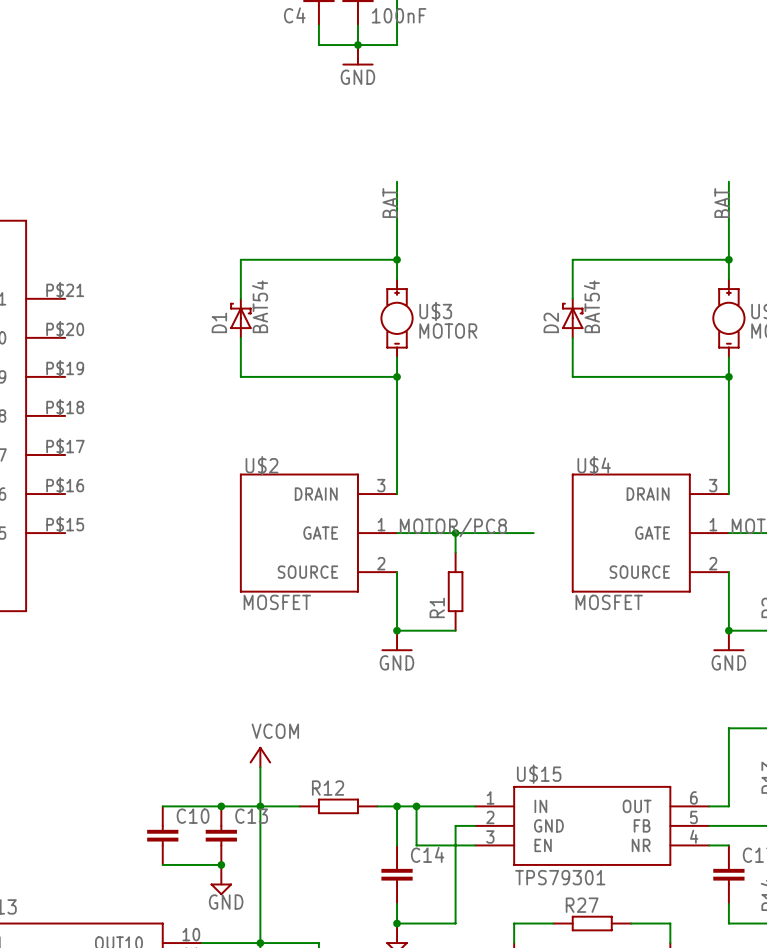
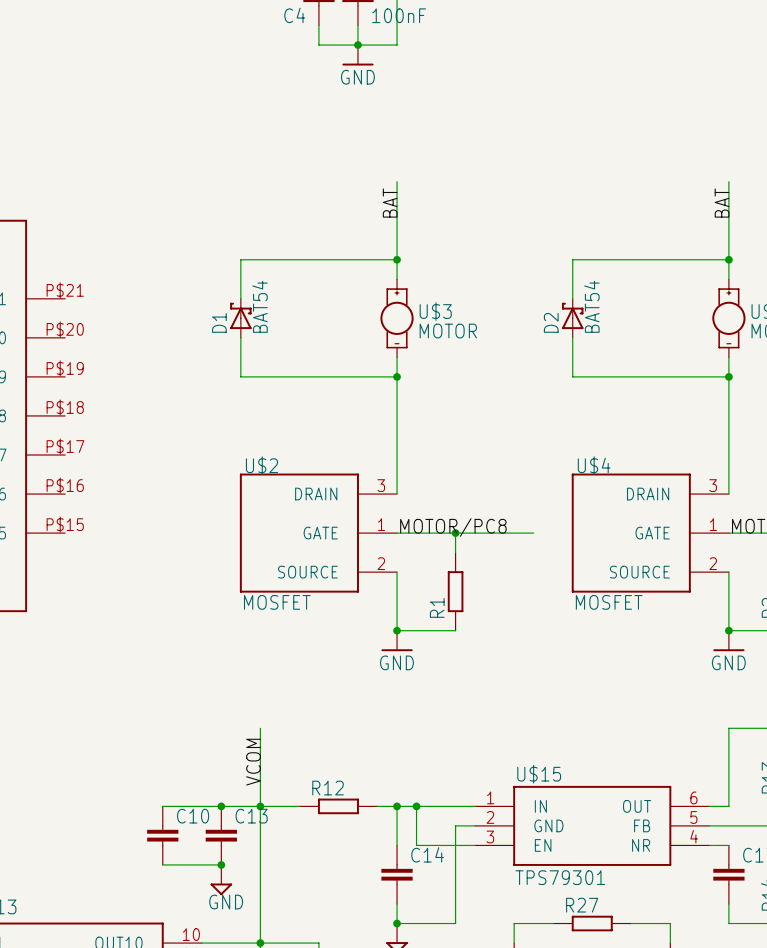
power symbol: VCOM (260, 757) -> none
label: none -> VCOM (253, 762)

